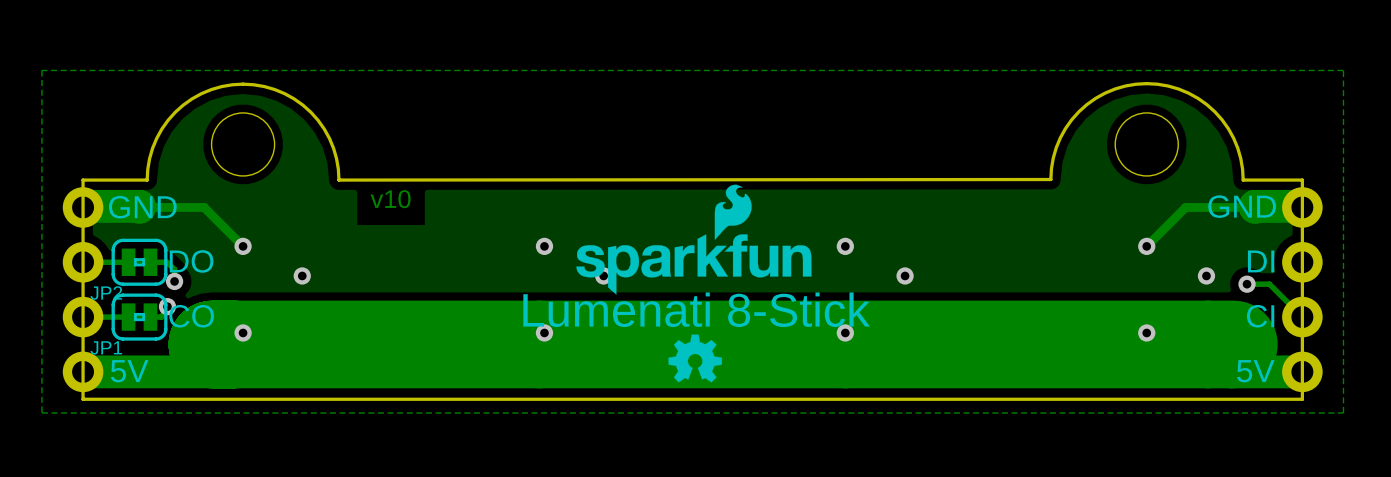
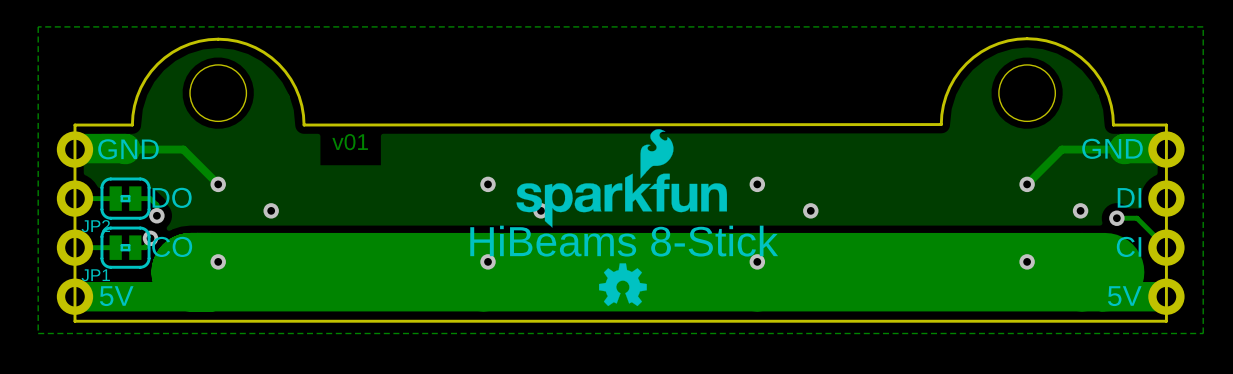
text: v10 (390, 199) -> v01 (350, 142)
text: Lumenati 8-Stick (696, 309) -> HiBeams 8-Stick (624, 241)

